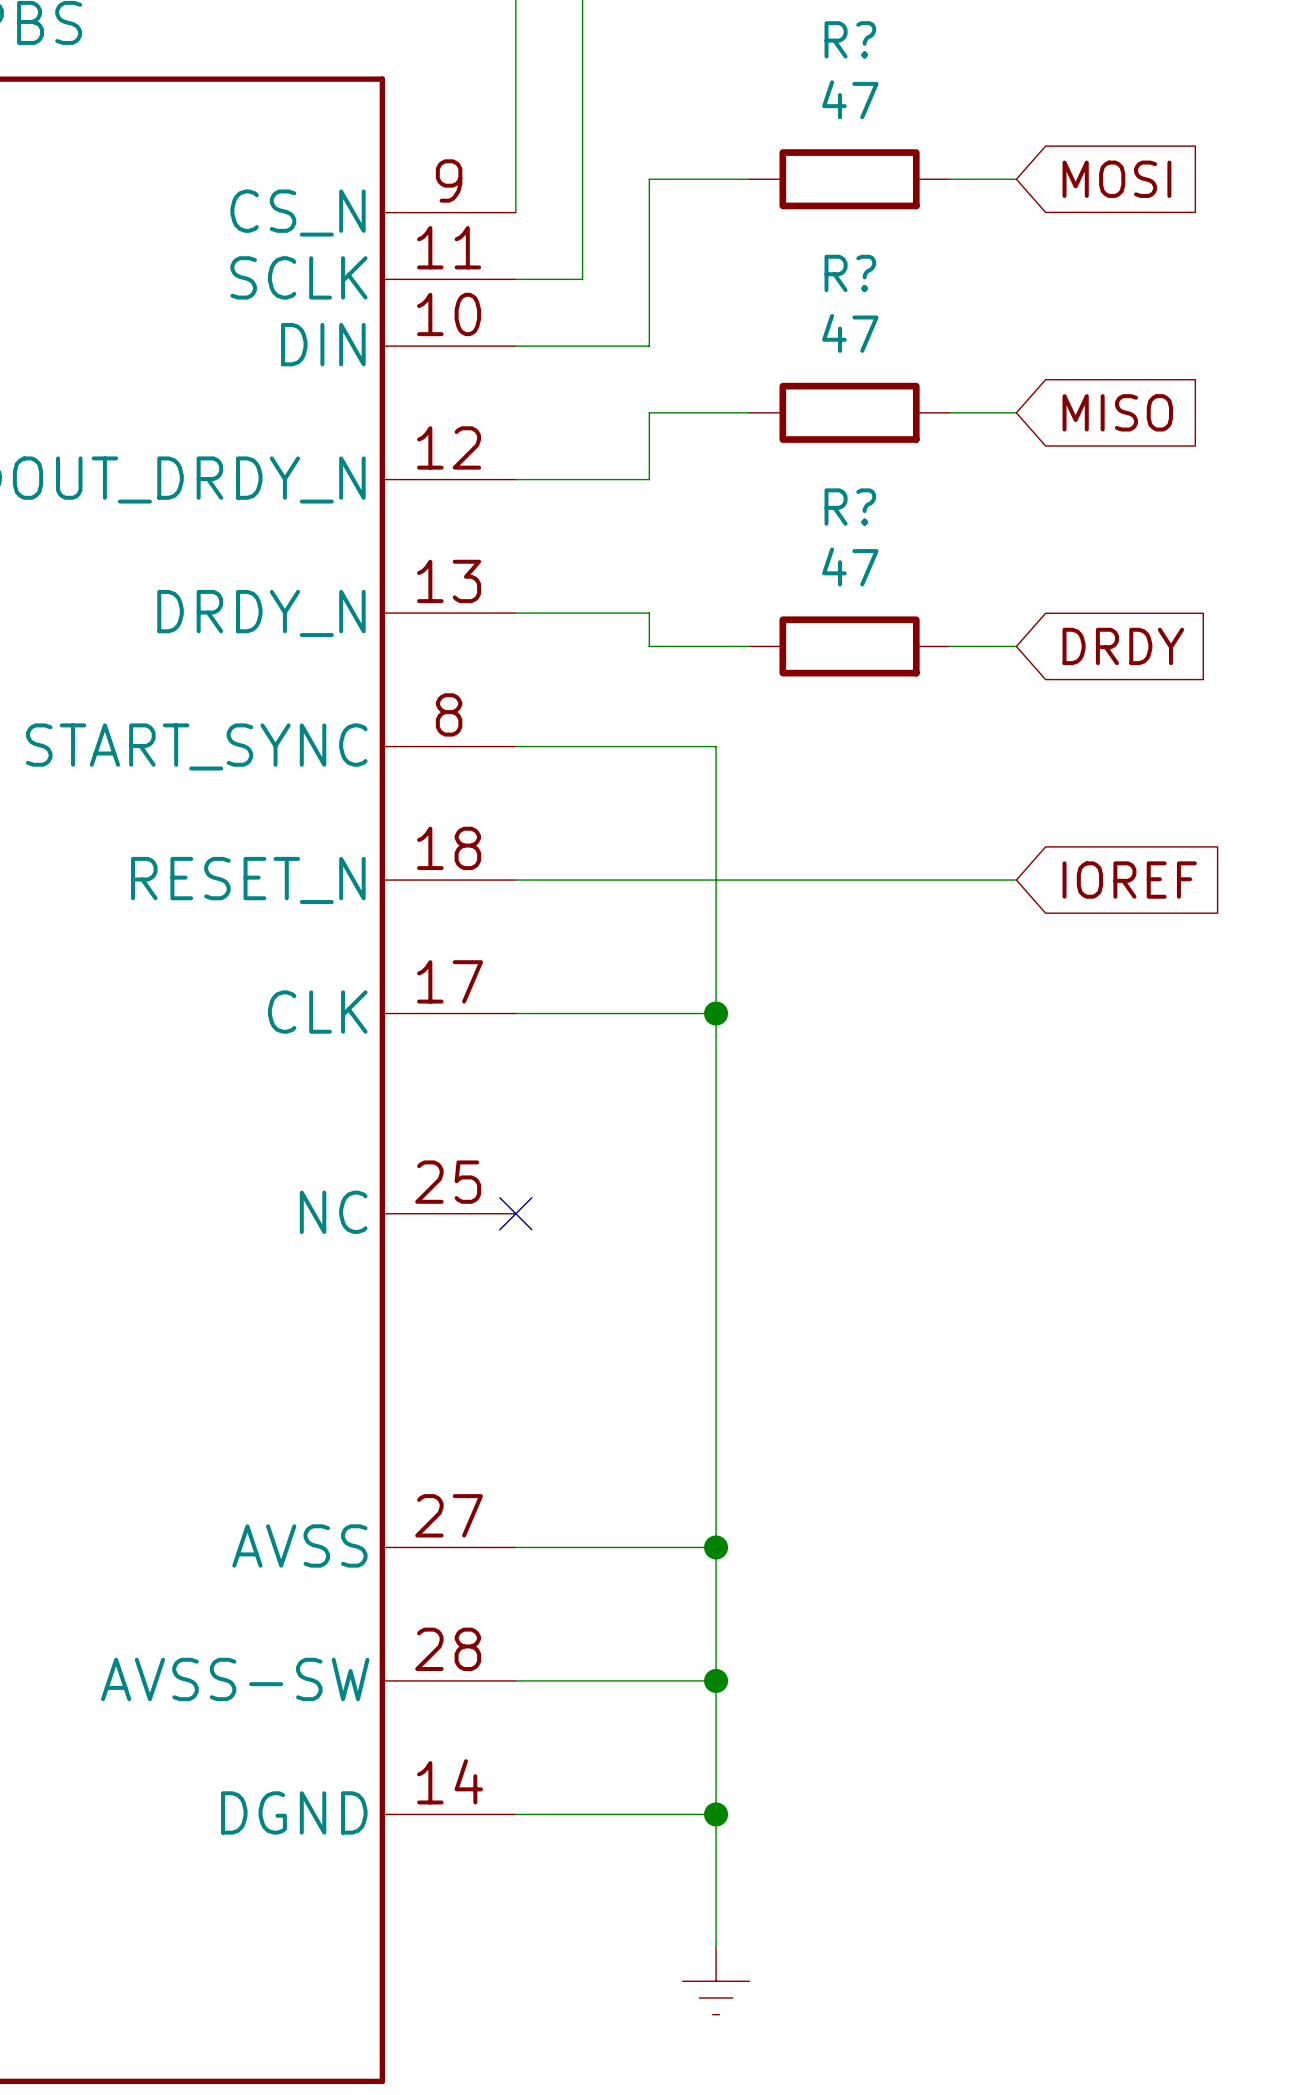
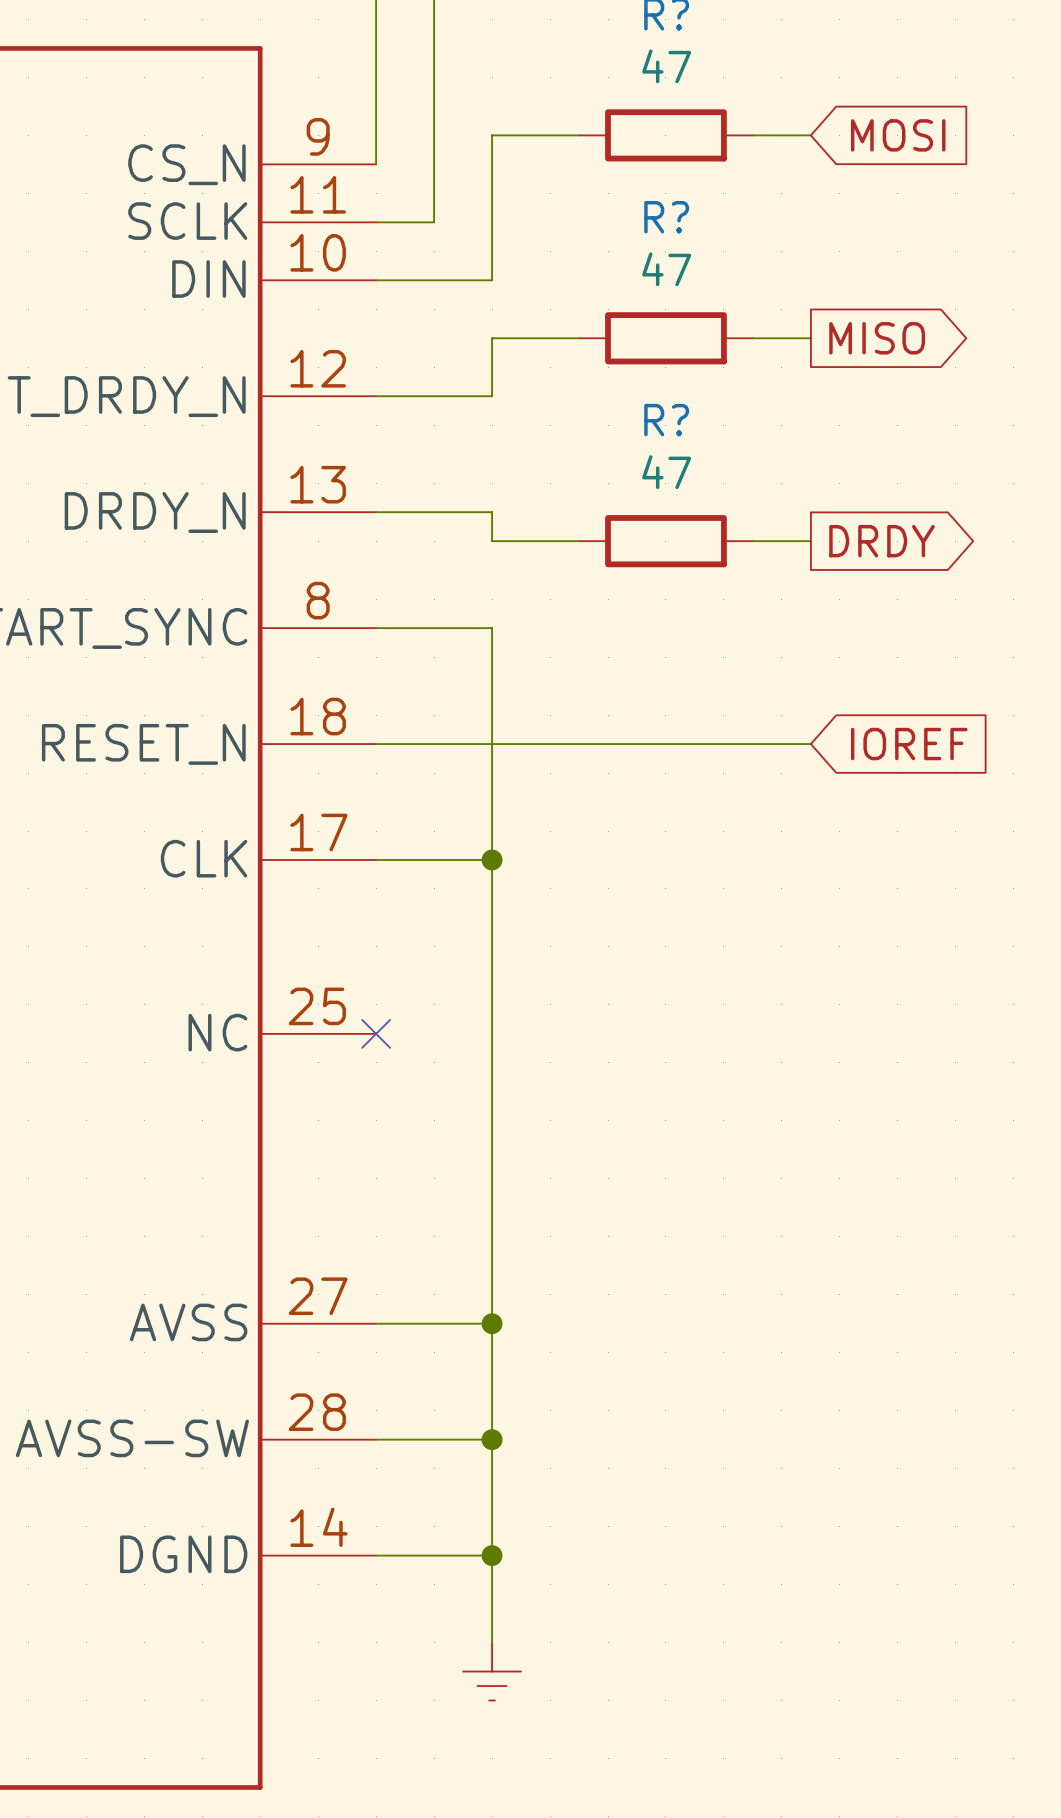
global label shape: input (1117, 412) -> output (877, 338)
global label shape: input (1123, 646) -> output (882, 541)
wire: (649, 746) (716, 746) (716, 1947) -> (492, 628) (492, 1642)
wire: (649, 1013) (716, 1013) -> none
junction position: (716, 1013) -> (492, 859)
wire: (649, 1547) (716, 1547) -> none
junction position: (716, 1547) -> (492, 1323)
wire: (649, 1680) (716, 1680) -> none
junction position: (716, 1680) -> (492, 1439)
wire: (649, 1814) (716, 1814) -> none
junction position: (716, 1814) -> (492, 1555)
power symbol position: (716, 1981) -> (492, 1671)

